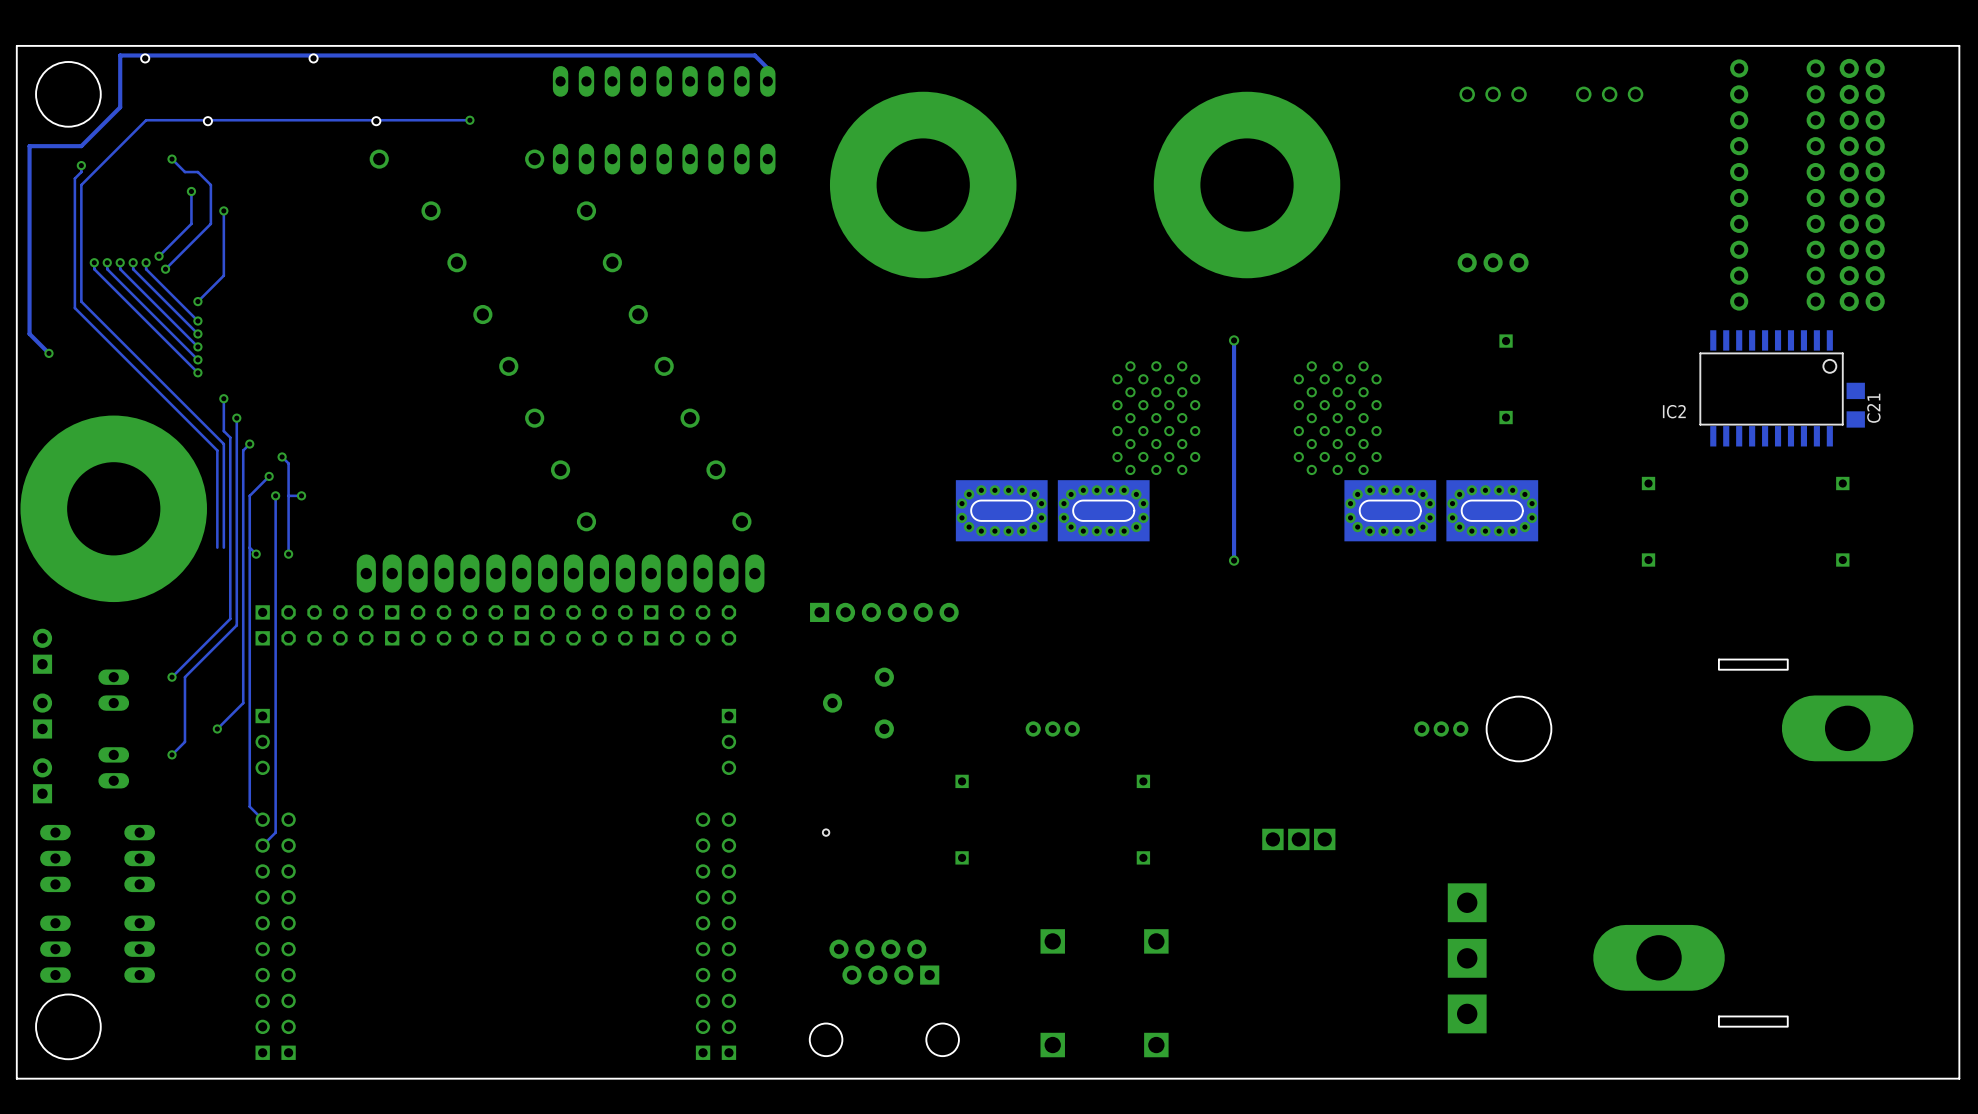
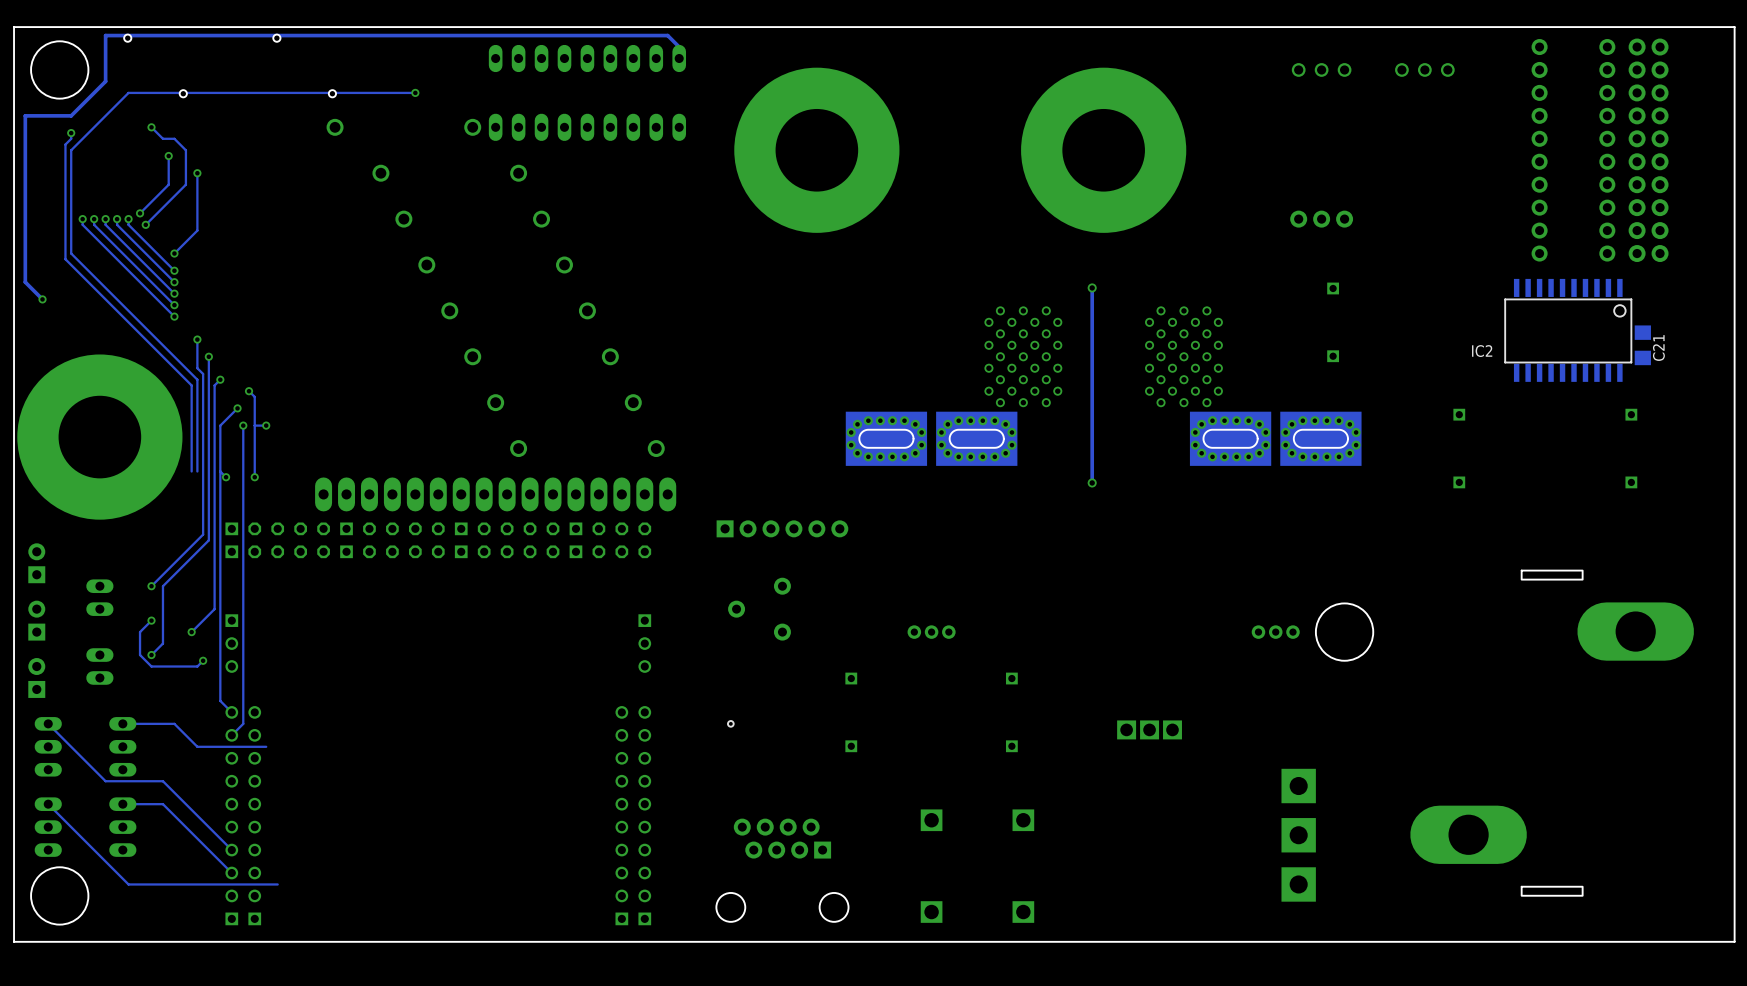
track: none -> (151, 620) (140, 632) (140, 655) (151, 666) (197, 666) (203, 660)
via: none -> (151, 620)
via: none -> (203, 660)
track: none -> (48, 723) (105, 781) (162, 781) (231, 850)
track: none -> (122, 723) (174, 723) (197, 746) (266, 746)
track: none -> (48, 804) (128, 884) (277, 884)
track: none -> (122, 804) (162, 804) (231, 873)

